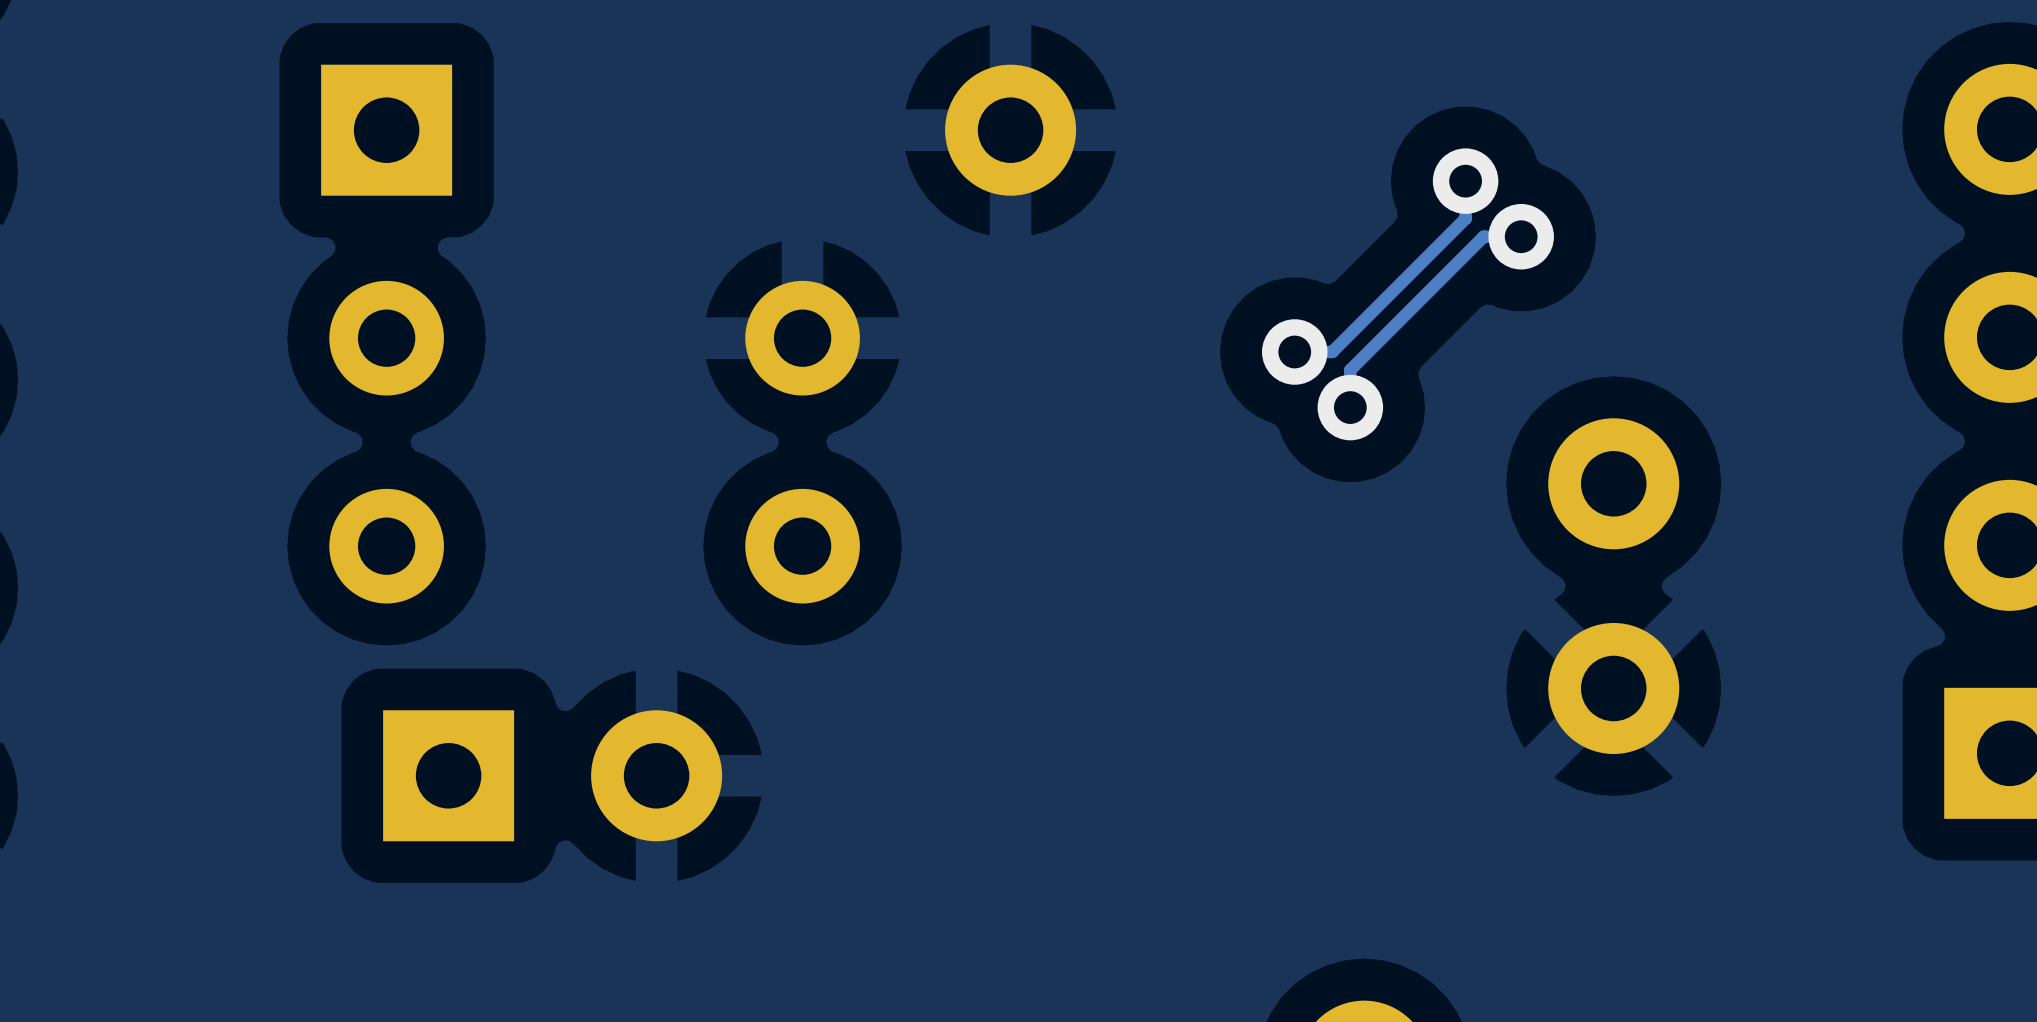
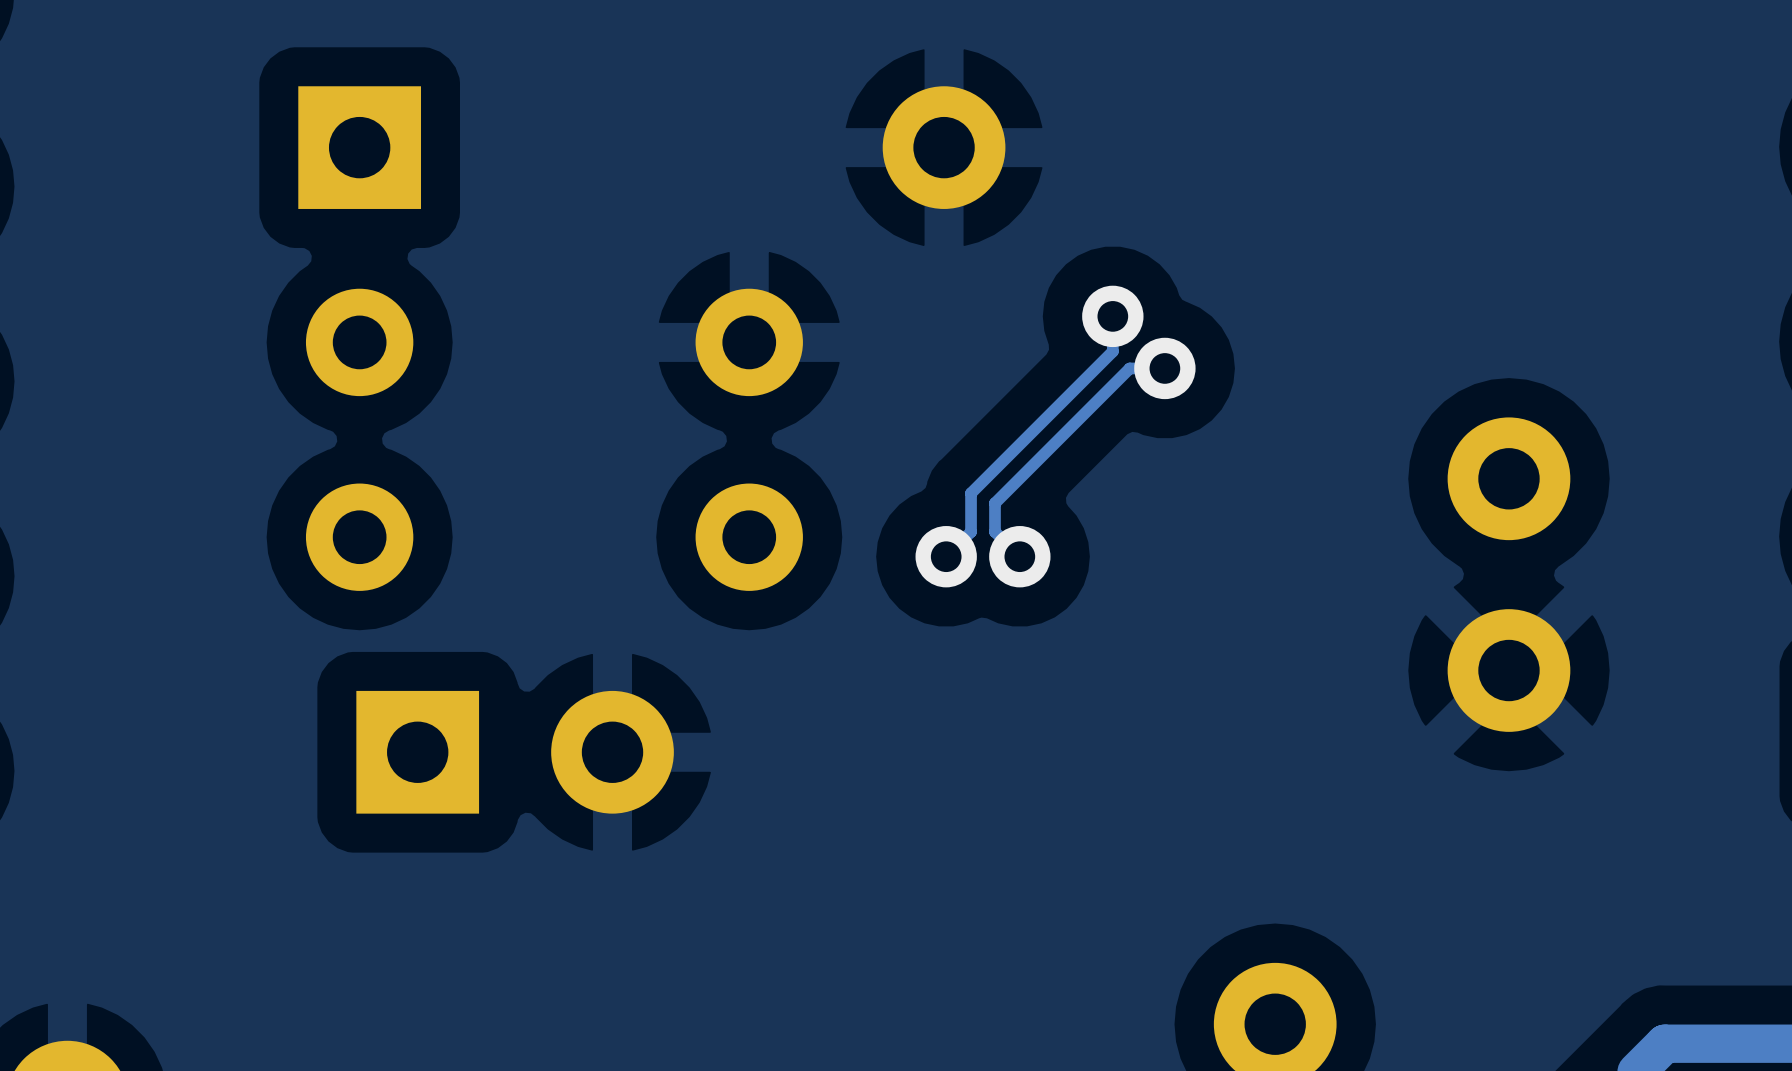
track: (1465, 181) (1465, 218) (1332, 351) (1294, 351) -> none
via: (1465, 181) -> none
track: (1521, 236) (1483, 236) (1350, 370) (1350, 407) -> none
via: (1521, 236) -> none
track: none -> (1112, 316) (1112, 351) (971, 493) (971, 531) (946, 556)
via: none -> (1112, 316)
via position: (1294, 351) -> (1164, 368)
track: none -> (1164, 368) (1129, 368) (994, 503) (994, 531) (1019, 556)
via: (1350, 407) -> none
via: none -> (946, 556)
via: none -> (1019, 556)

